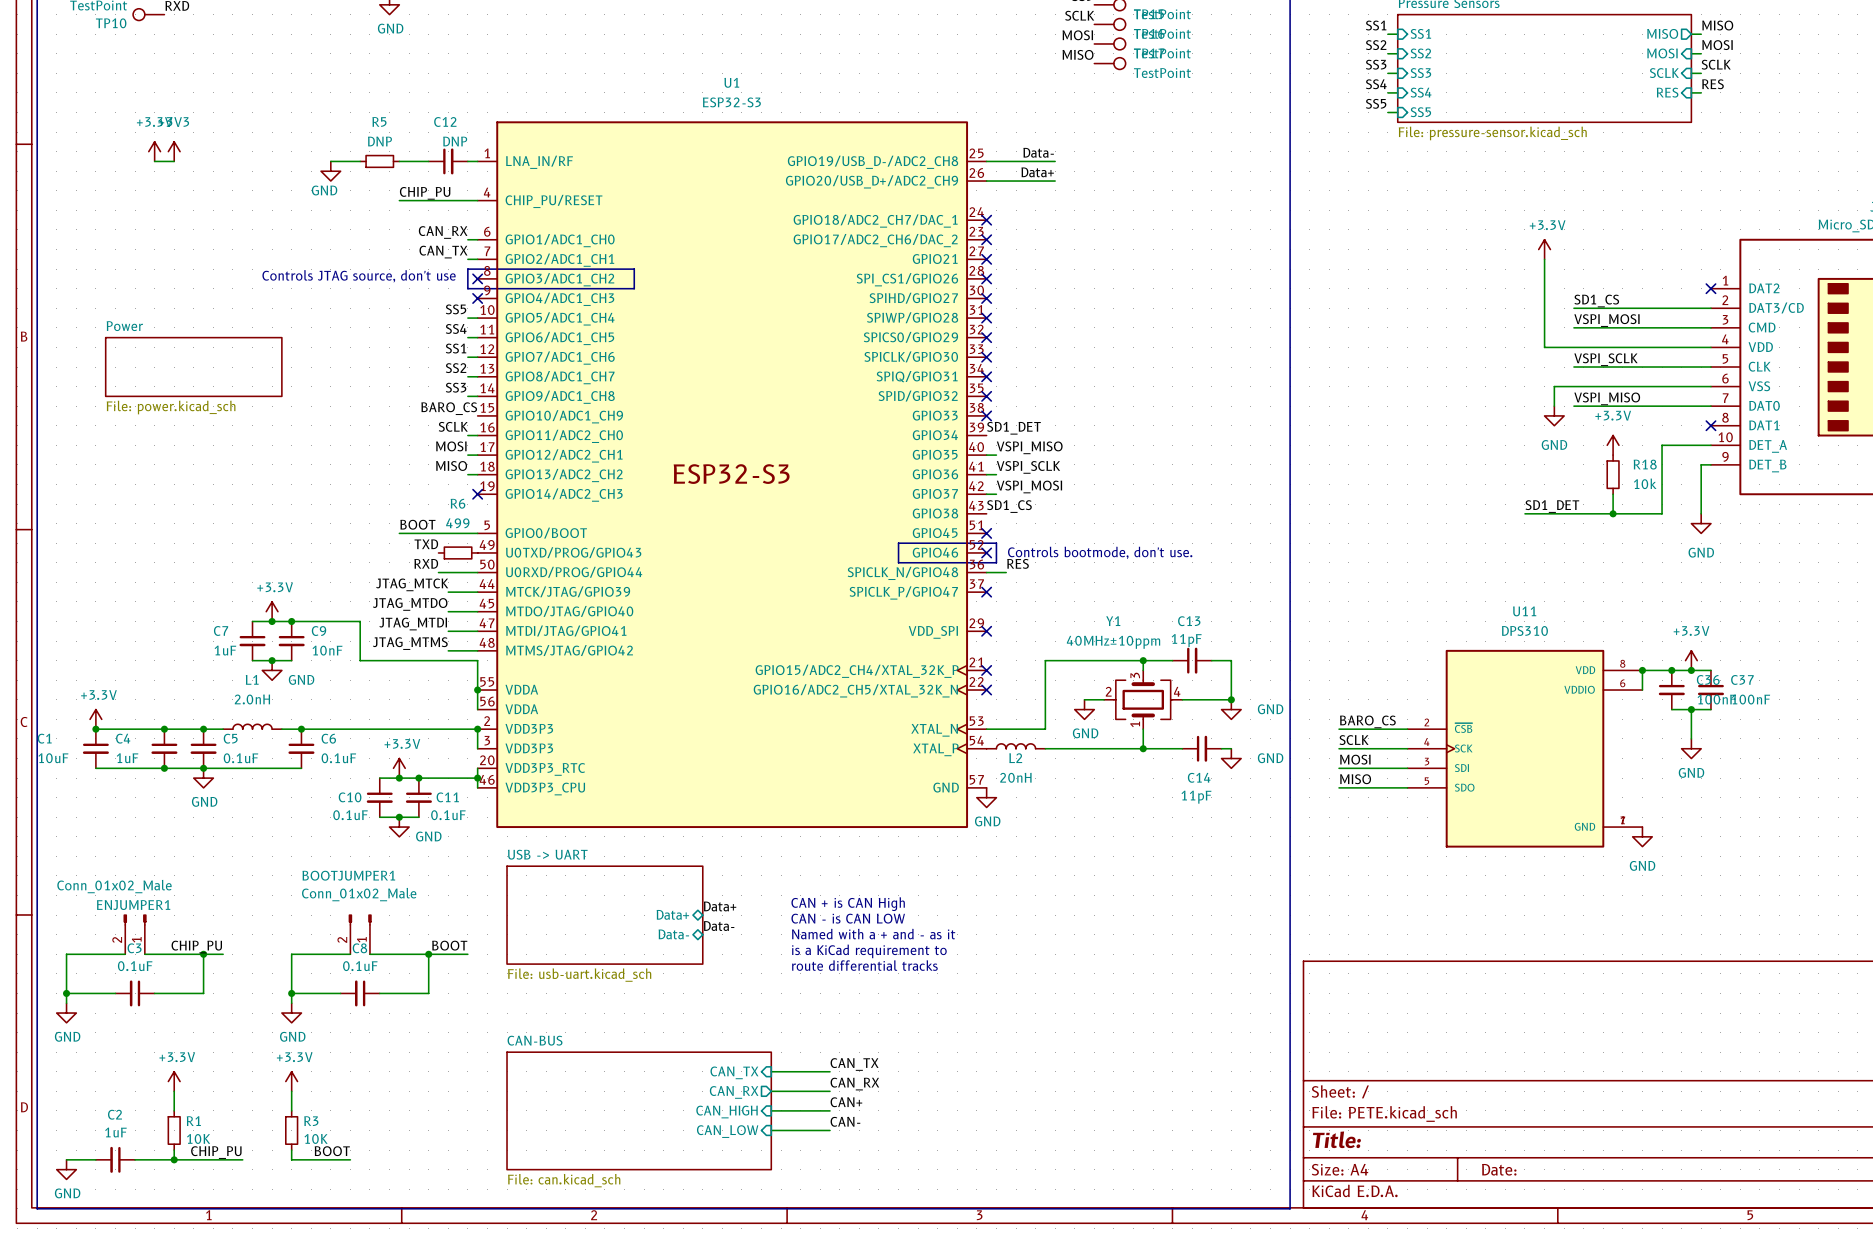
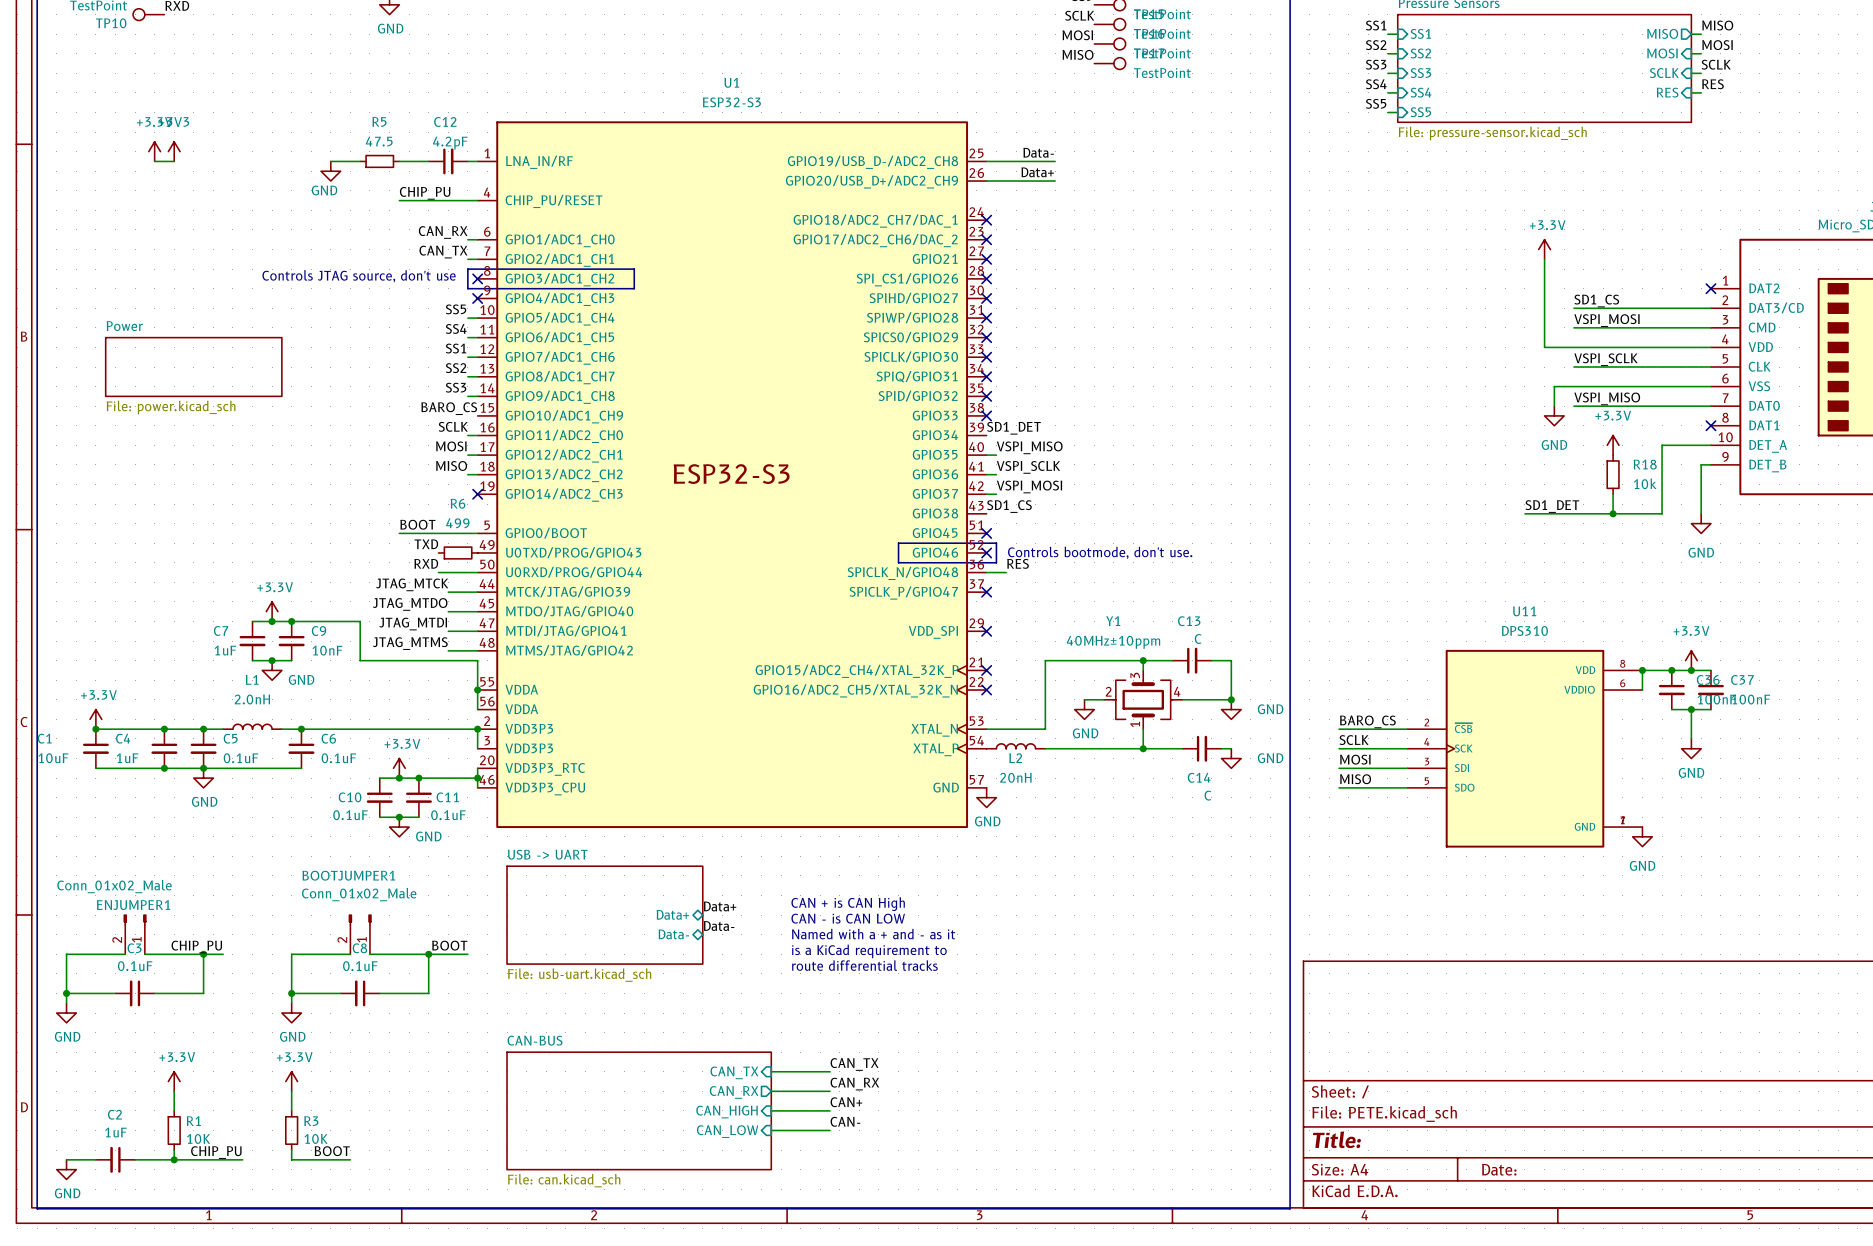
R5 value: DNP (379, 141) -> 47.5 (379, 141)
C12 value: DNP (455, 141) -> 4.2pF (450, 143)
C13 value: 11pF (1186, 640) -> C (1198, 639)
C14 value: 11pF (1196, 797) -> C (1207, 795)

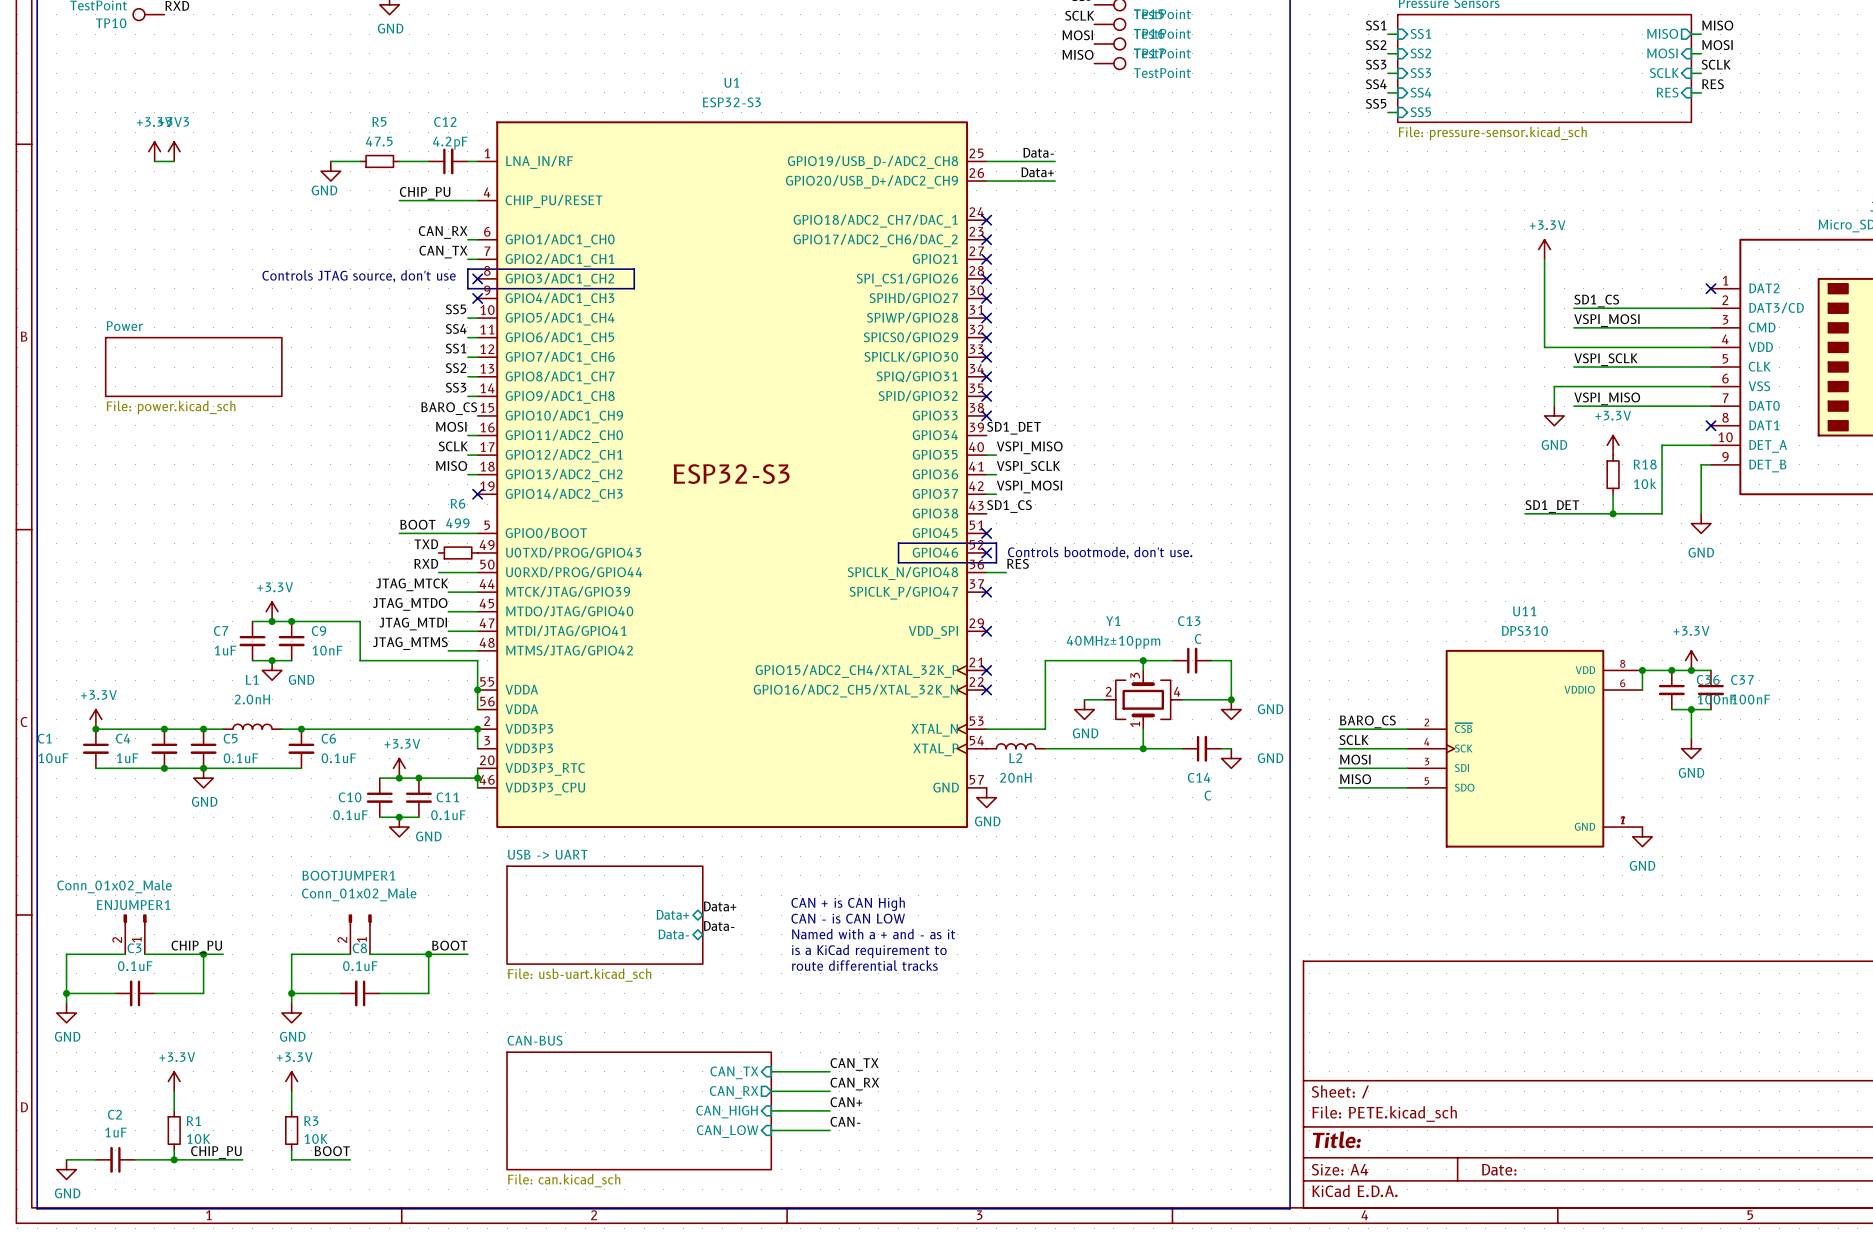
label: SCLK (453, 426) -> MOSI (451, 426)
label: MOSI (451, 446) -> SCLK (453, 446)

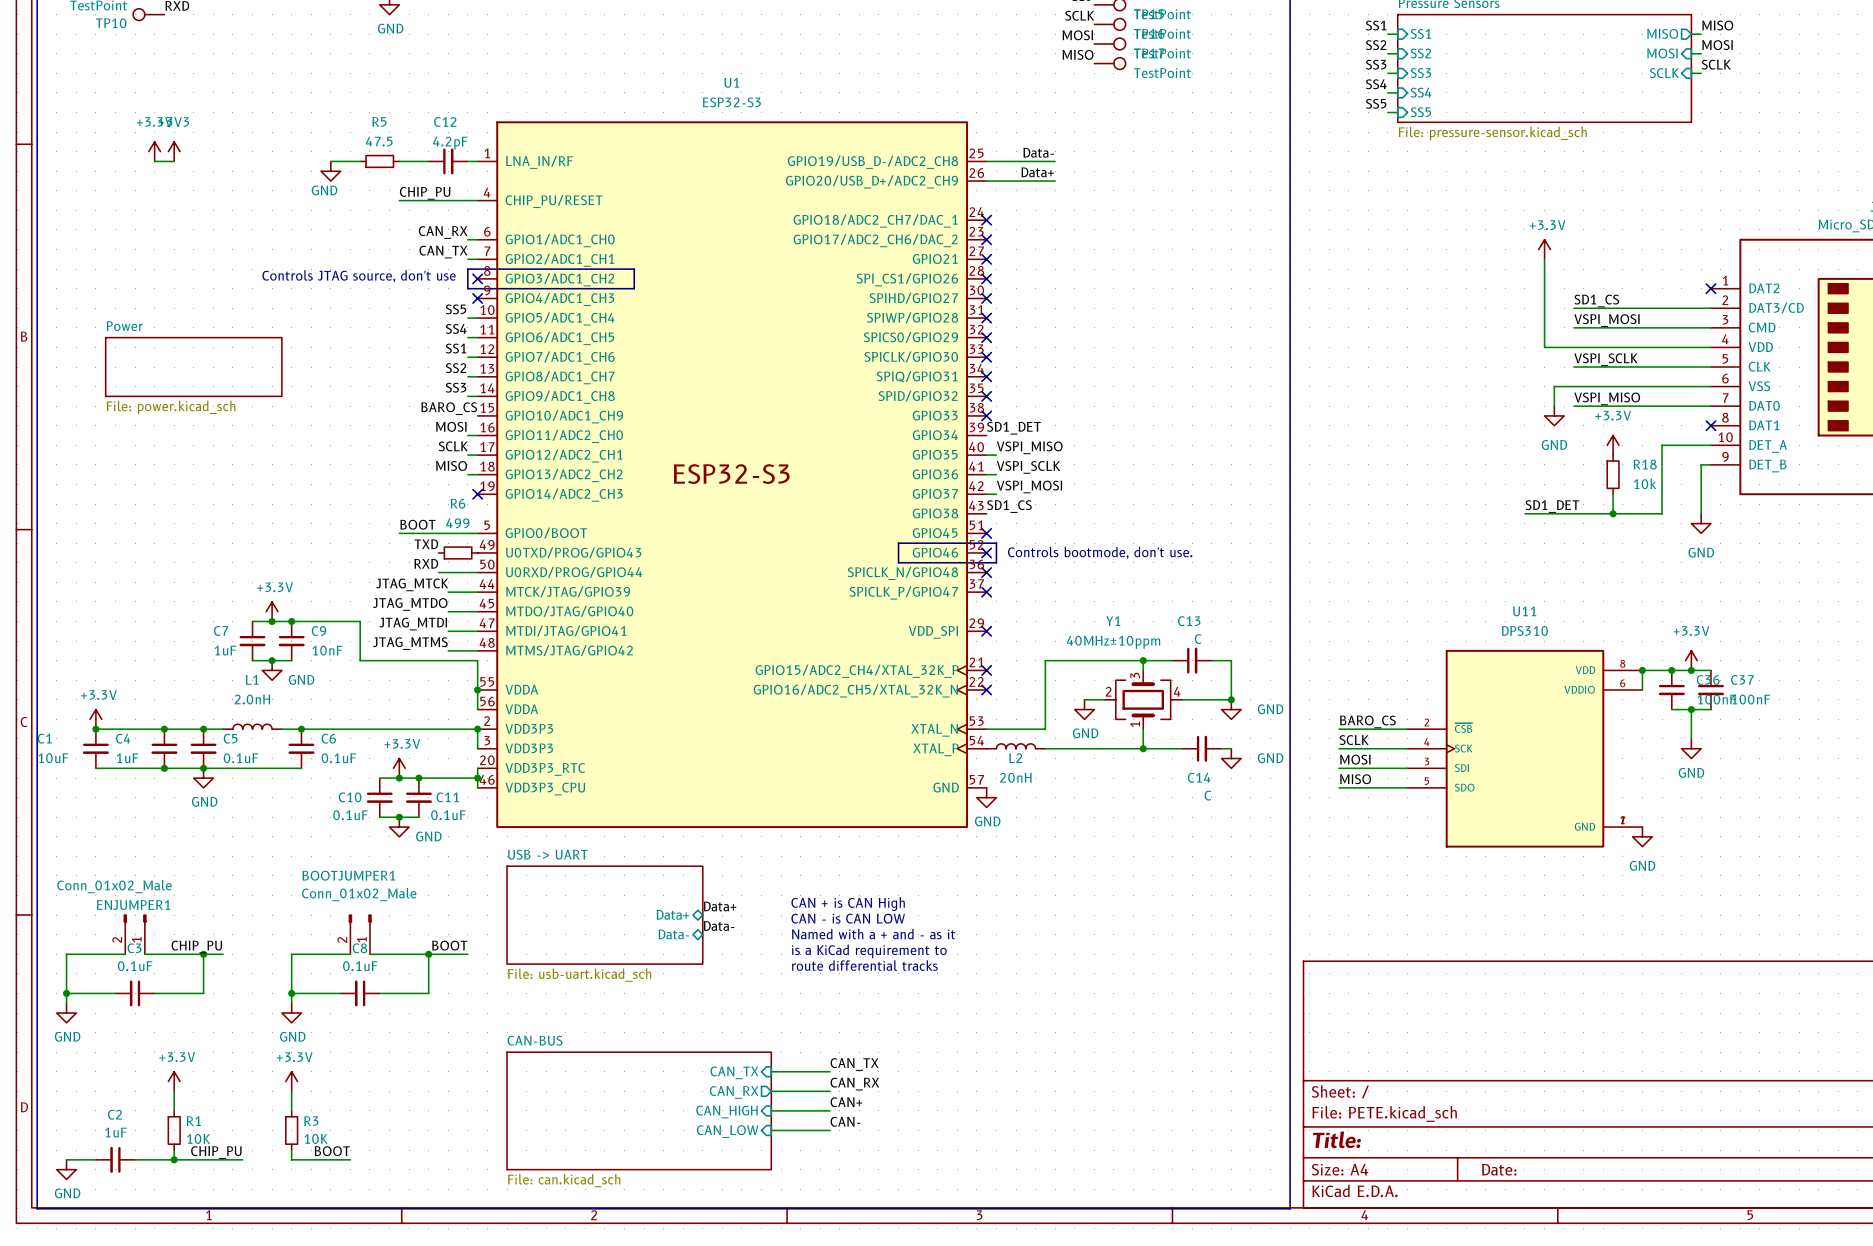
label: RES (1712, 84) -> none
sheet pin: RES (1667, 92) -> none
wire: (1691, 92) (1701, 92) -> none
label: RES (1018, 563) -> none
wire: (986, 572) (1006, 572) -> none
no-connect mark: none -> (986, 572)

